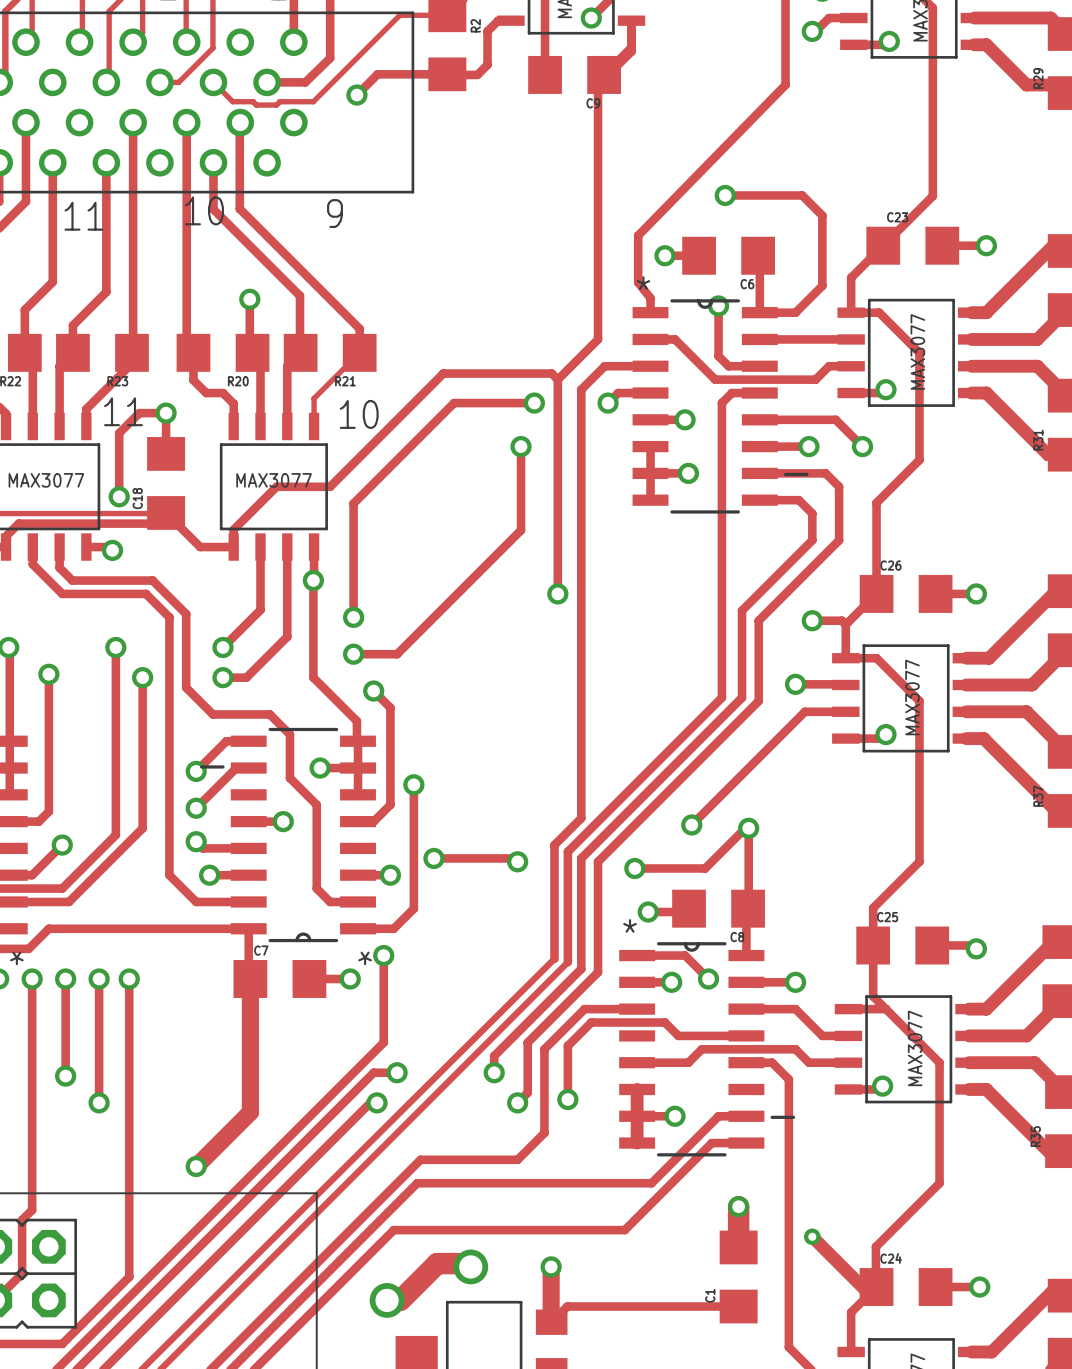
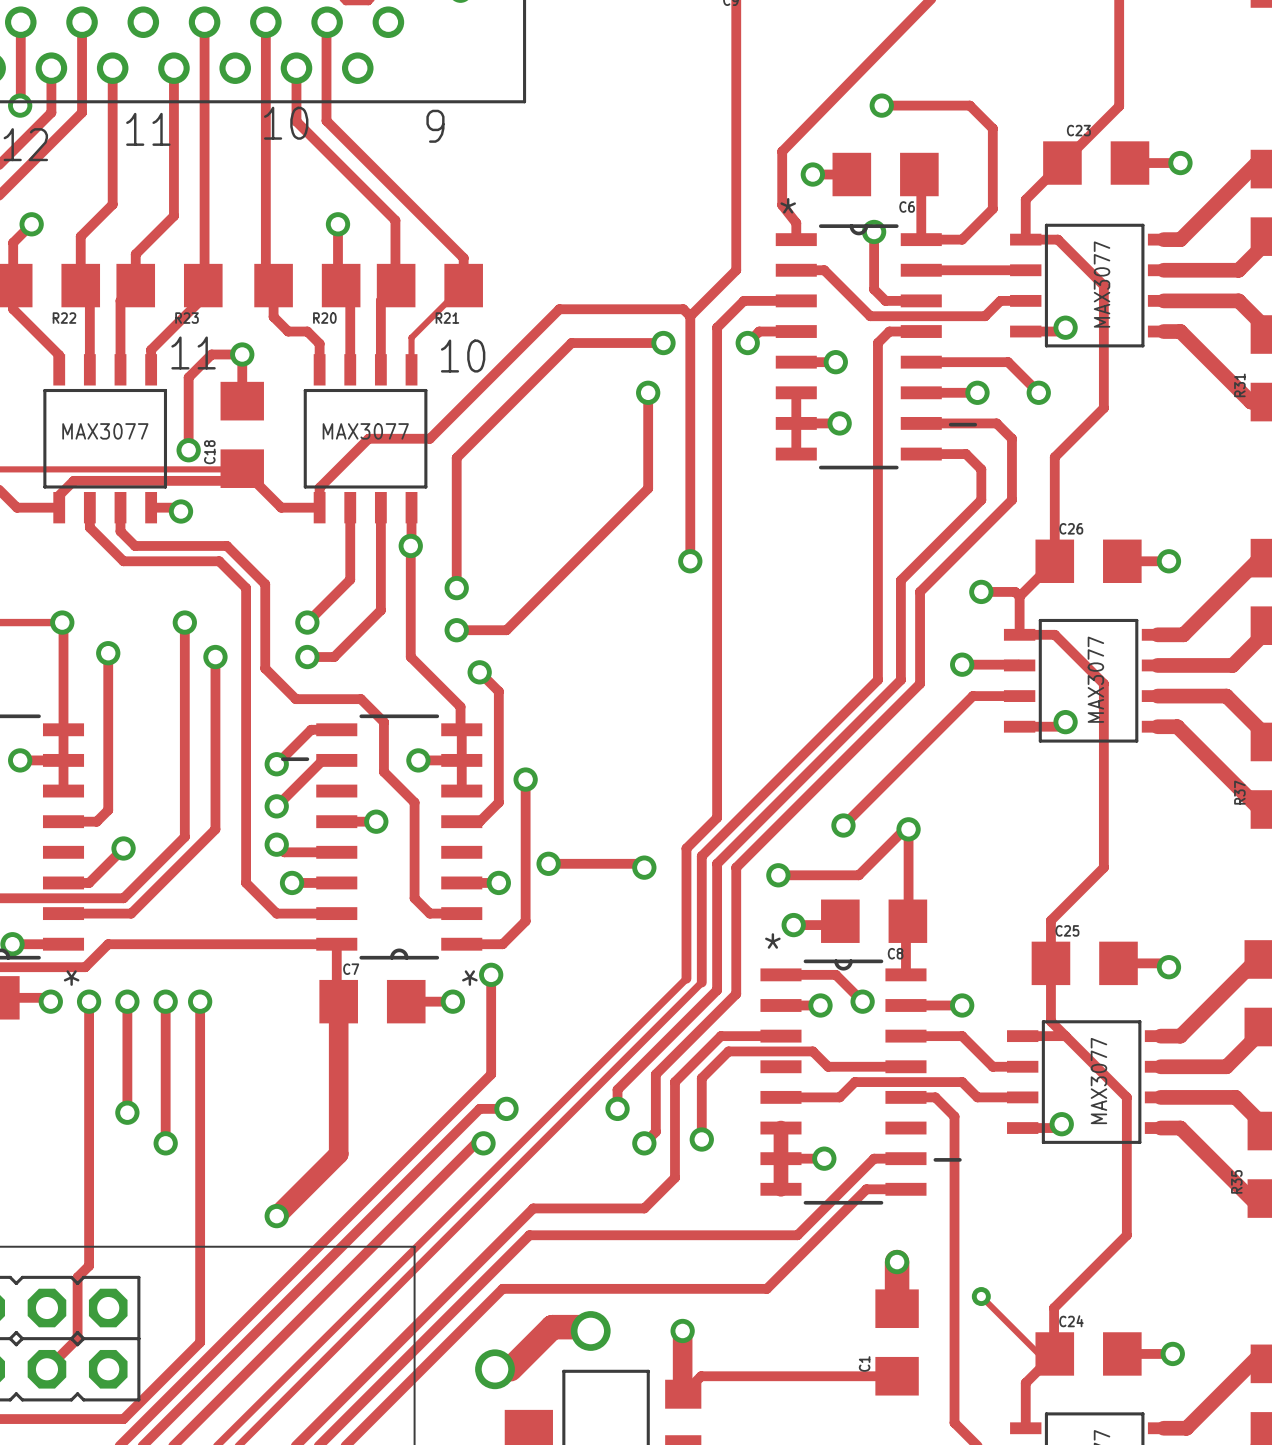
track width: thick (812, 1236) (865, 1290) -> thin (981, 1296) (1042, 1357)

